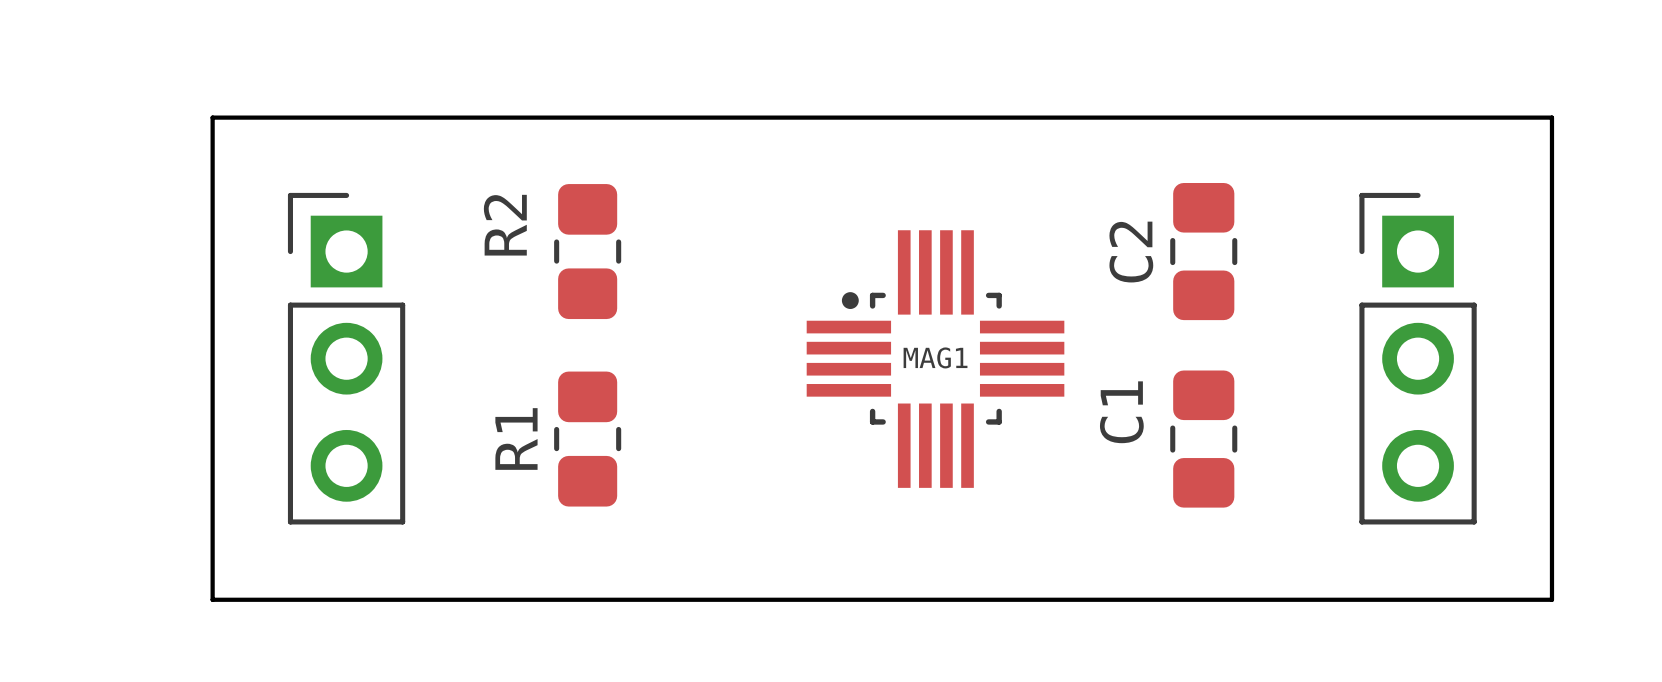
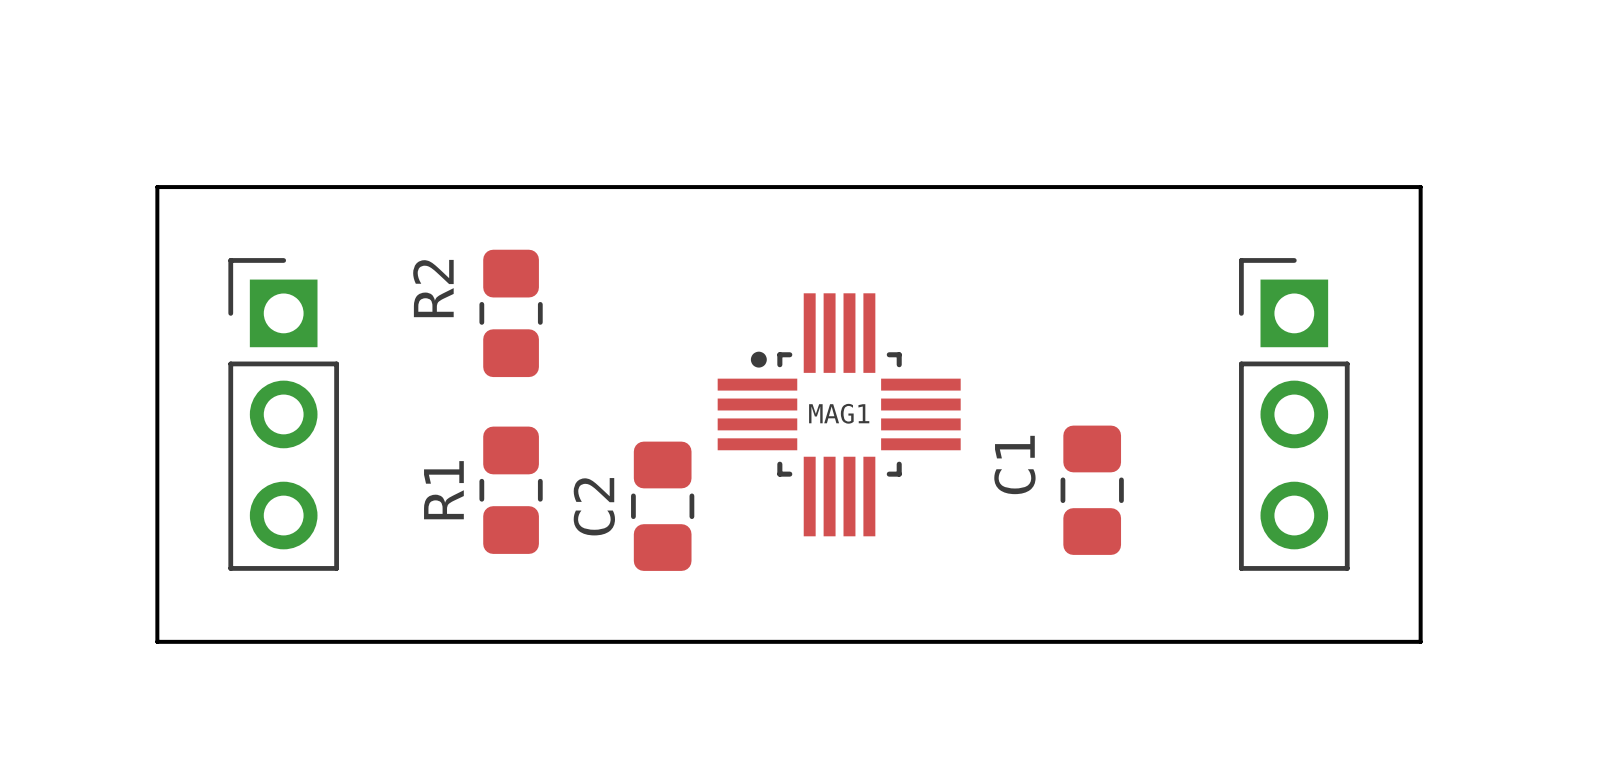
C2 position: (1203, 251) -> (662, 506)

